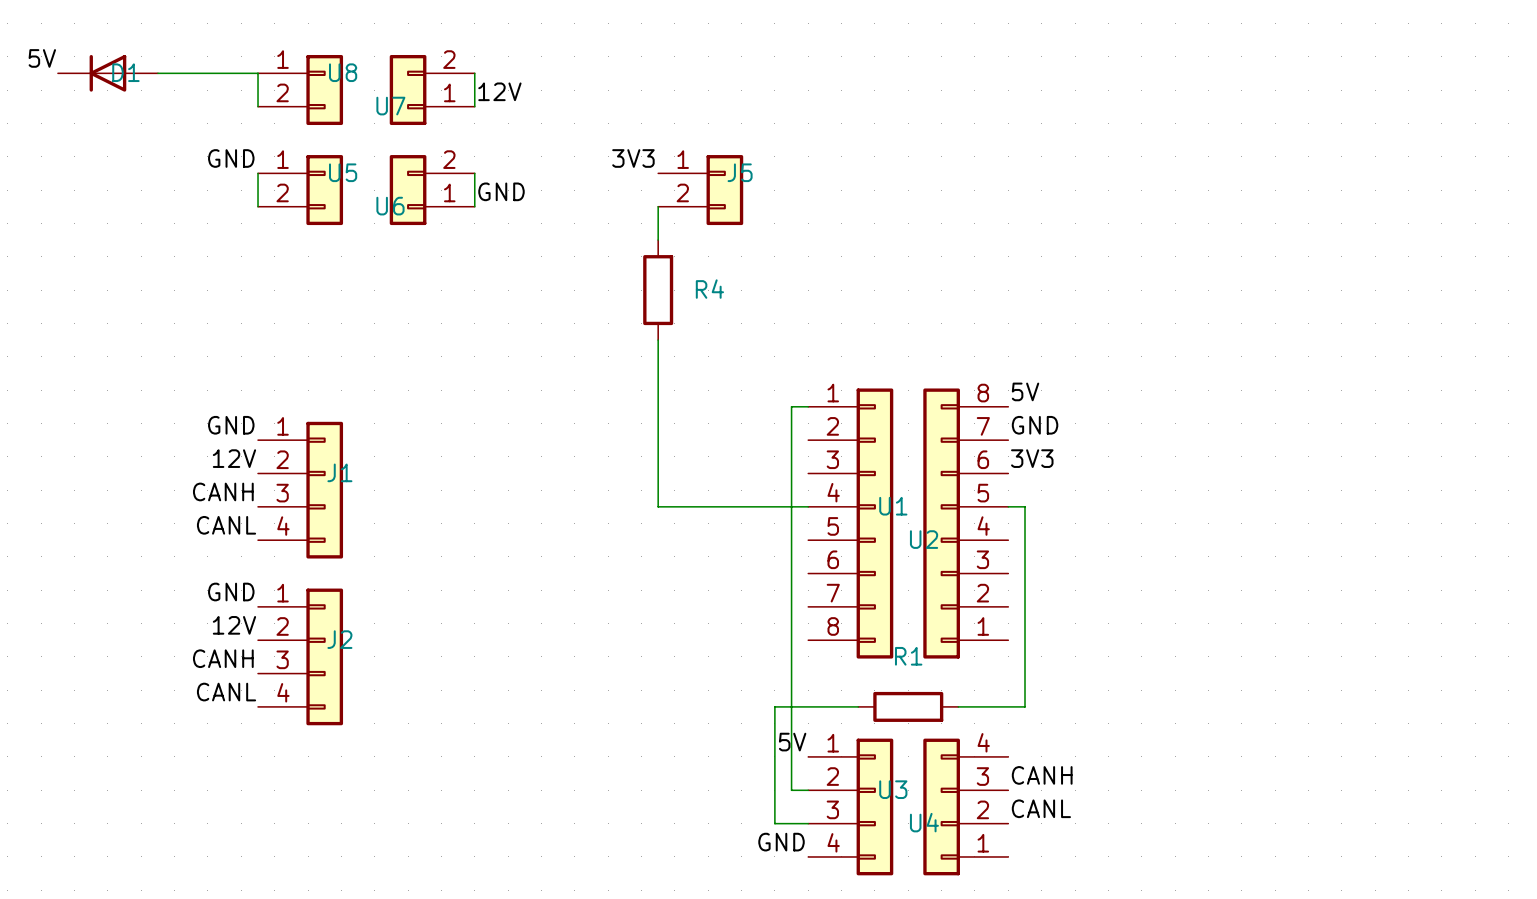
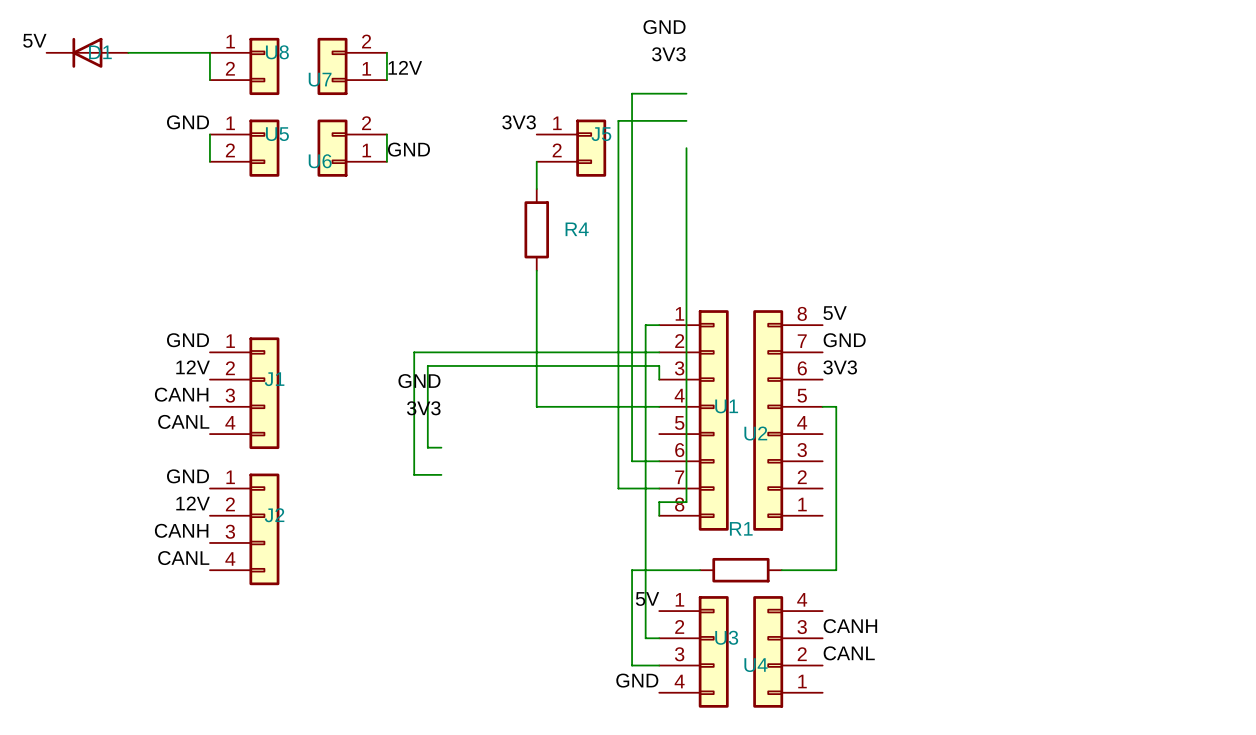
label: none -> GND (664, 27)
label: none -> 3V3 (668, 54)
wire: none -> (686, 93) (632, 93) (632, 461) (659, 461)
wire: none -> (686, 120) (618, 120) (618, 488) (659, 488)
wire: none -> (686, 148) (686, 502) (659, 502) (659, 515)
wire: none -> (659, 352) (414, 352) (414, 474) (441, 474)
wire: none -> (659, 379) (659, 365) (427, 365) (427, 447) (441, 447)
label: none -> GND (419, 381)
label: none -> 3V3 (423, 408)

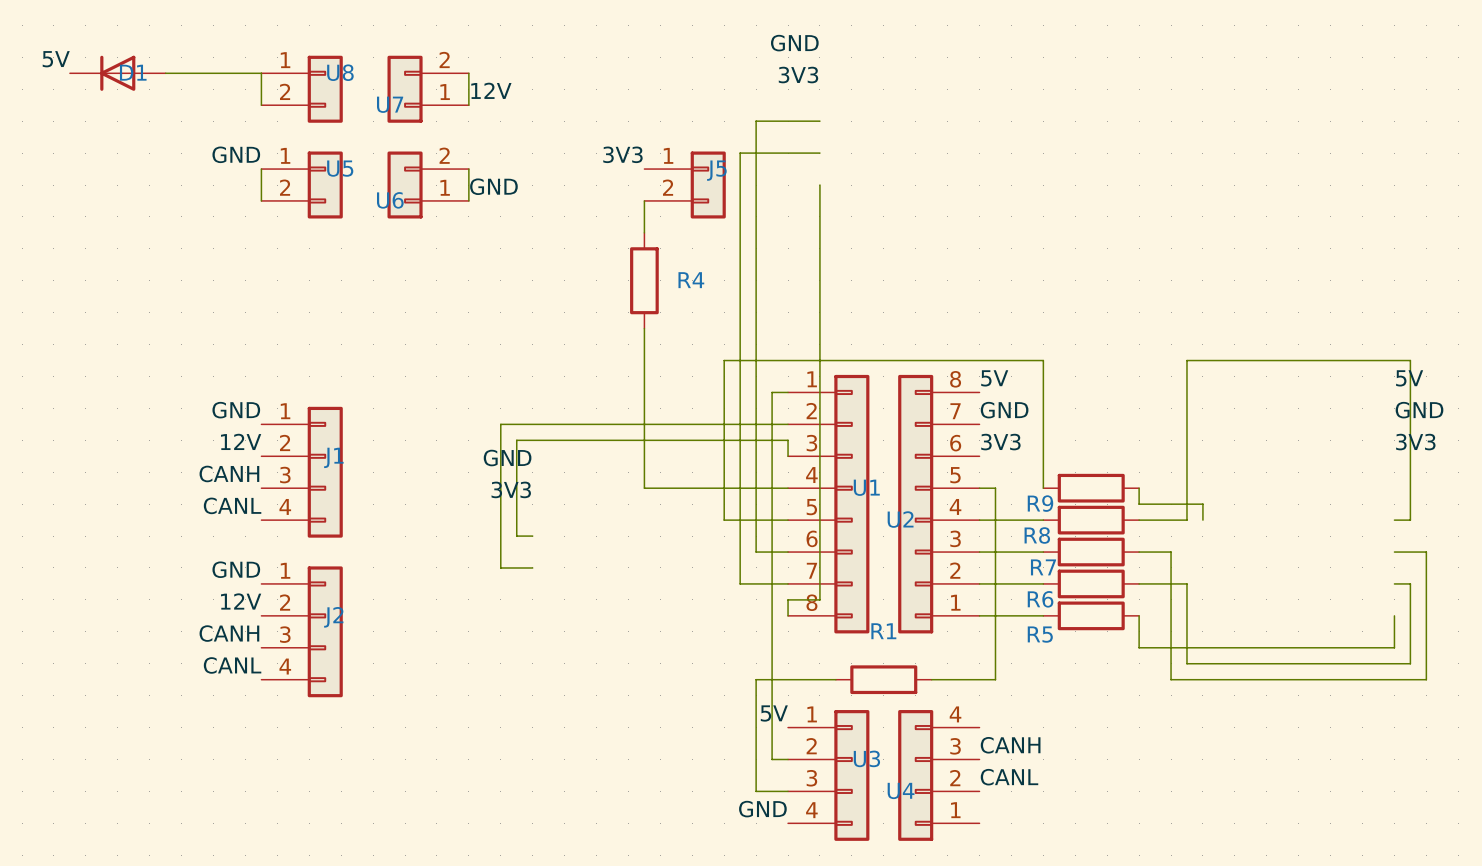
label: none -> 5V (1409, 378)
label: none -> GND (1419, 410)
label: none -> 3V3 (1415, 442)
wire: none -> (1043, 488) (1043, 360) (724, 360) (724, 520) (788, 520)
R9: none -> (1091, 488)
wire: none -> (1139, 488) (1139, 504) (1202, 504) (1202, 520)
wire: none -> (979, 520) (1043, 520)
R8: none -> (1091, 520)
wire: none -> (1139, 520) (1186, 520) (1186, 360) (1410, 360) (1410, 520) (1394, 520)
wire: none -> (979, 552) (1043, 552)
R7: none -> (1091, 552)
wire: none -> (1139, 552) (1171, 552) (1171, 679) (1426, 679) (1426, 552) (1394, 552)
wire: none -> (979, 583) (1043, 583)
R6: none -> (1091, 583)
wire: none -> (1139, 583) (1186, 583) (1186, 663) (1410, 663) (1410, 583) (1394, 583)
wire: none -> (979, 615) (1043, 615)
R5: none -> (1091, 615)
wire: none -> (1139, 615) (1139, 647) (1394, 647) (1394, 615)

